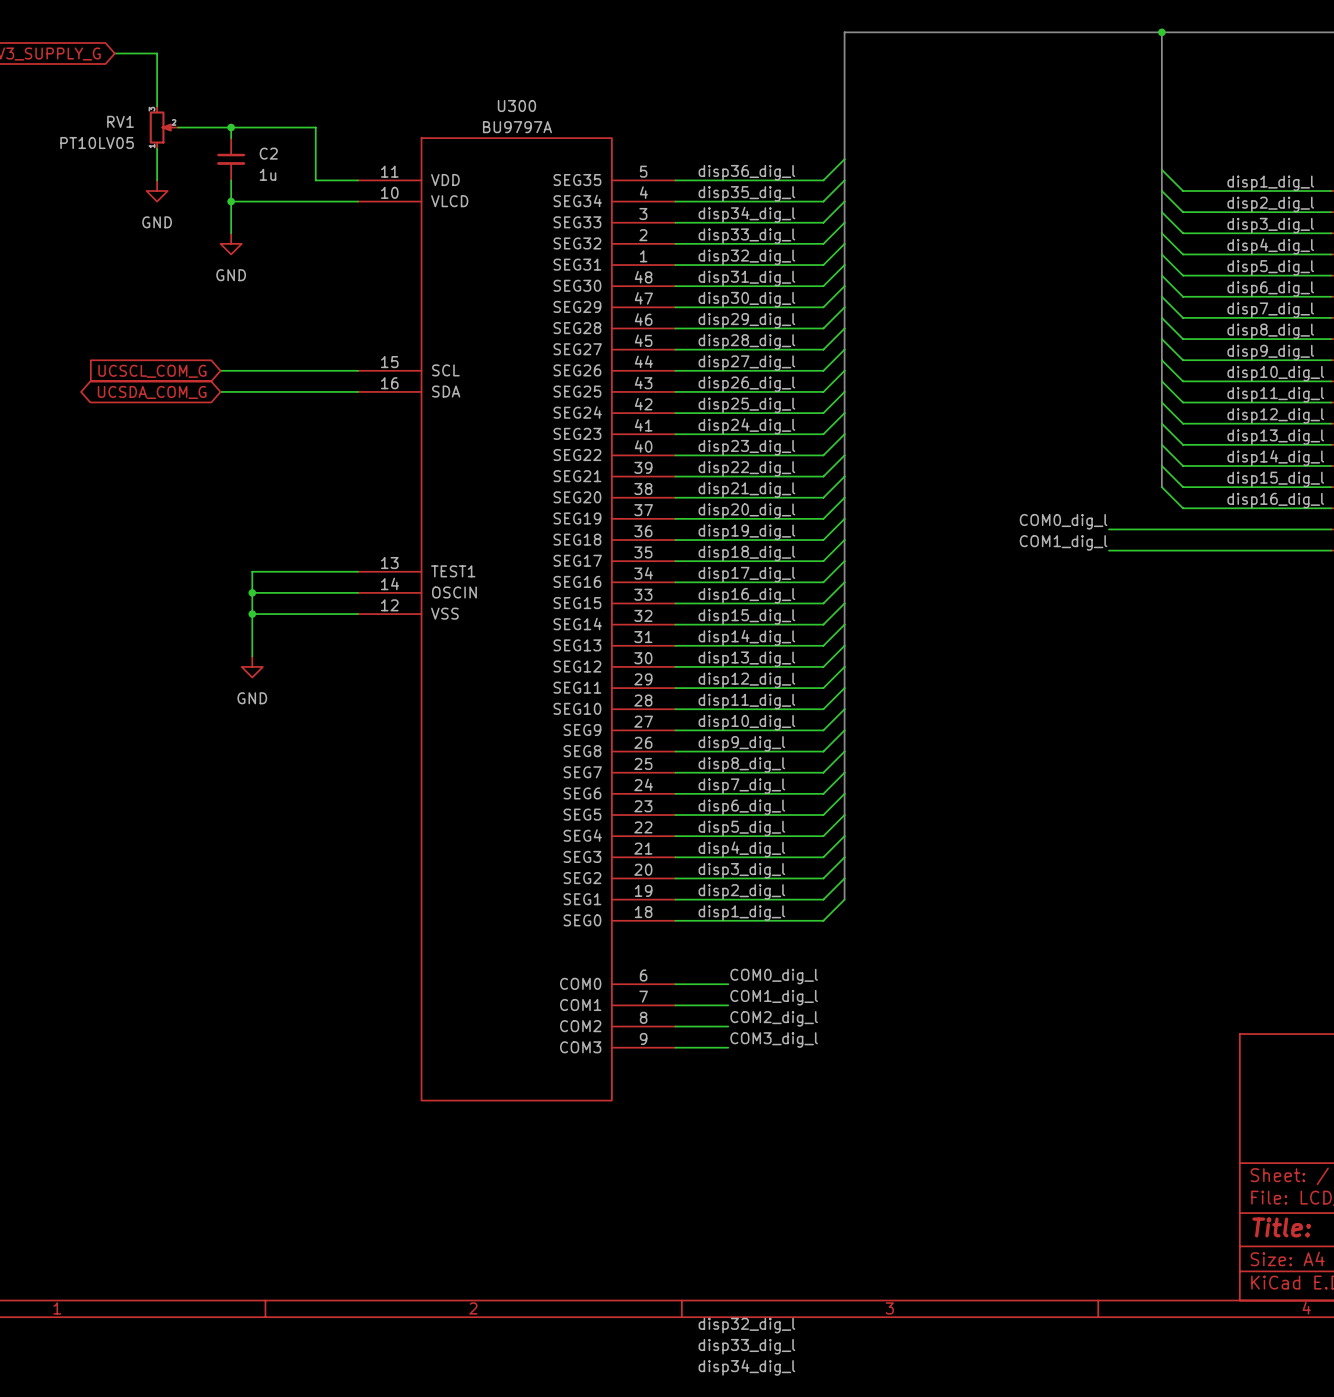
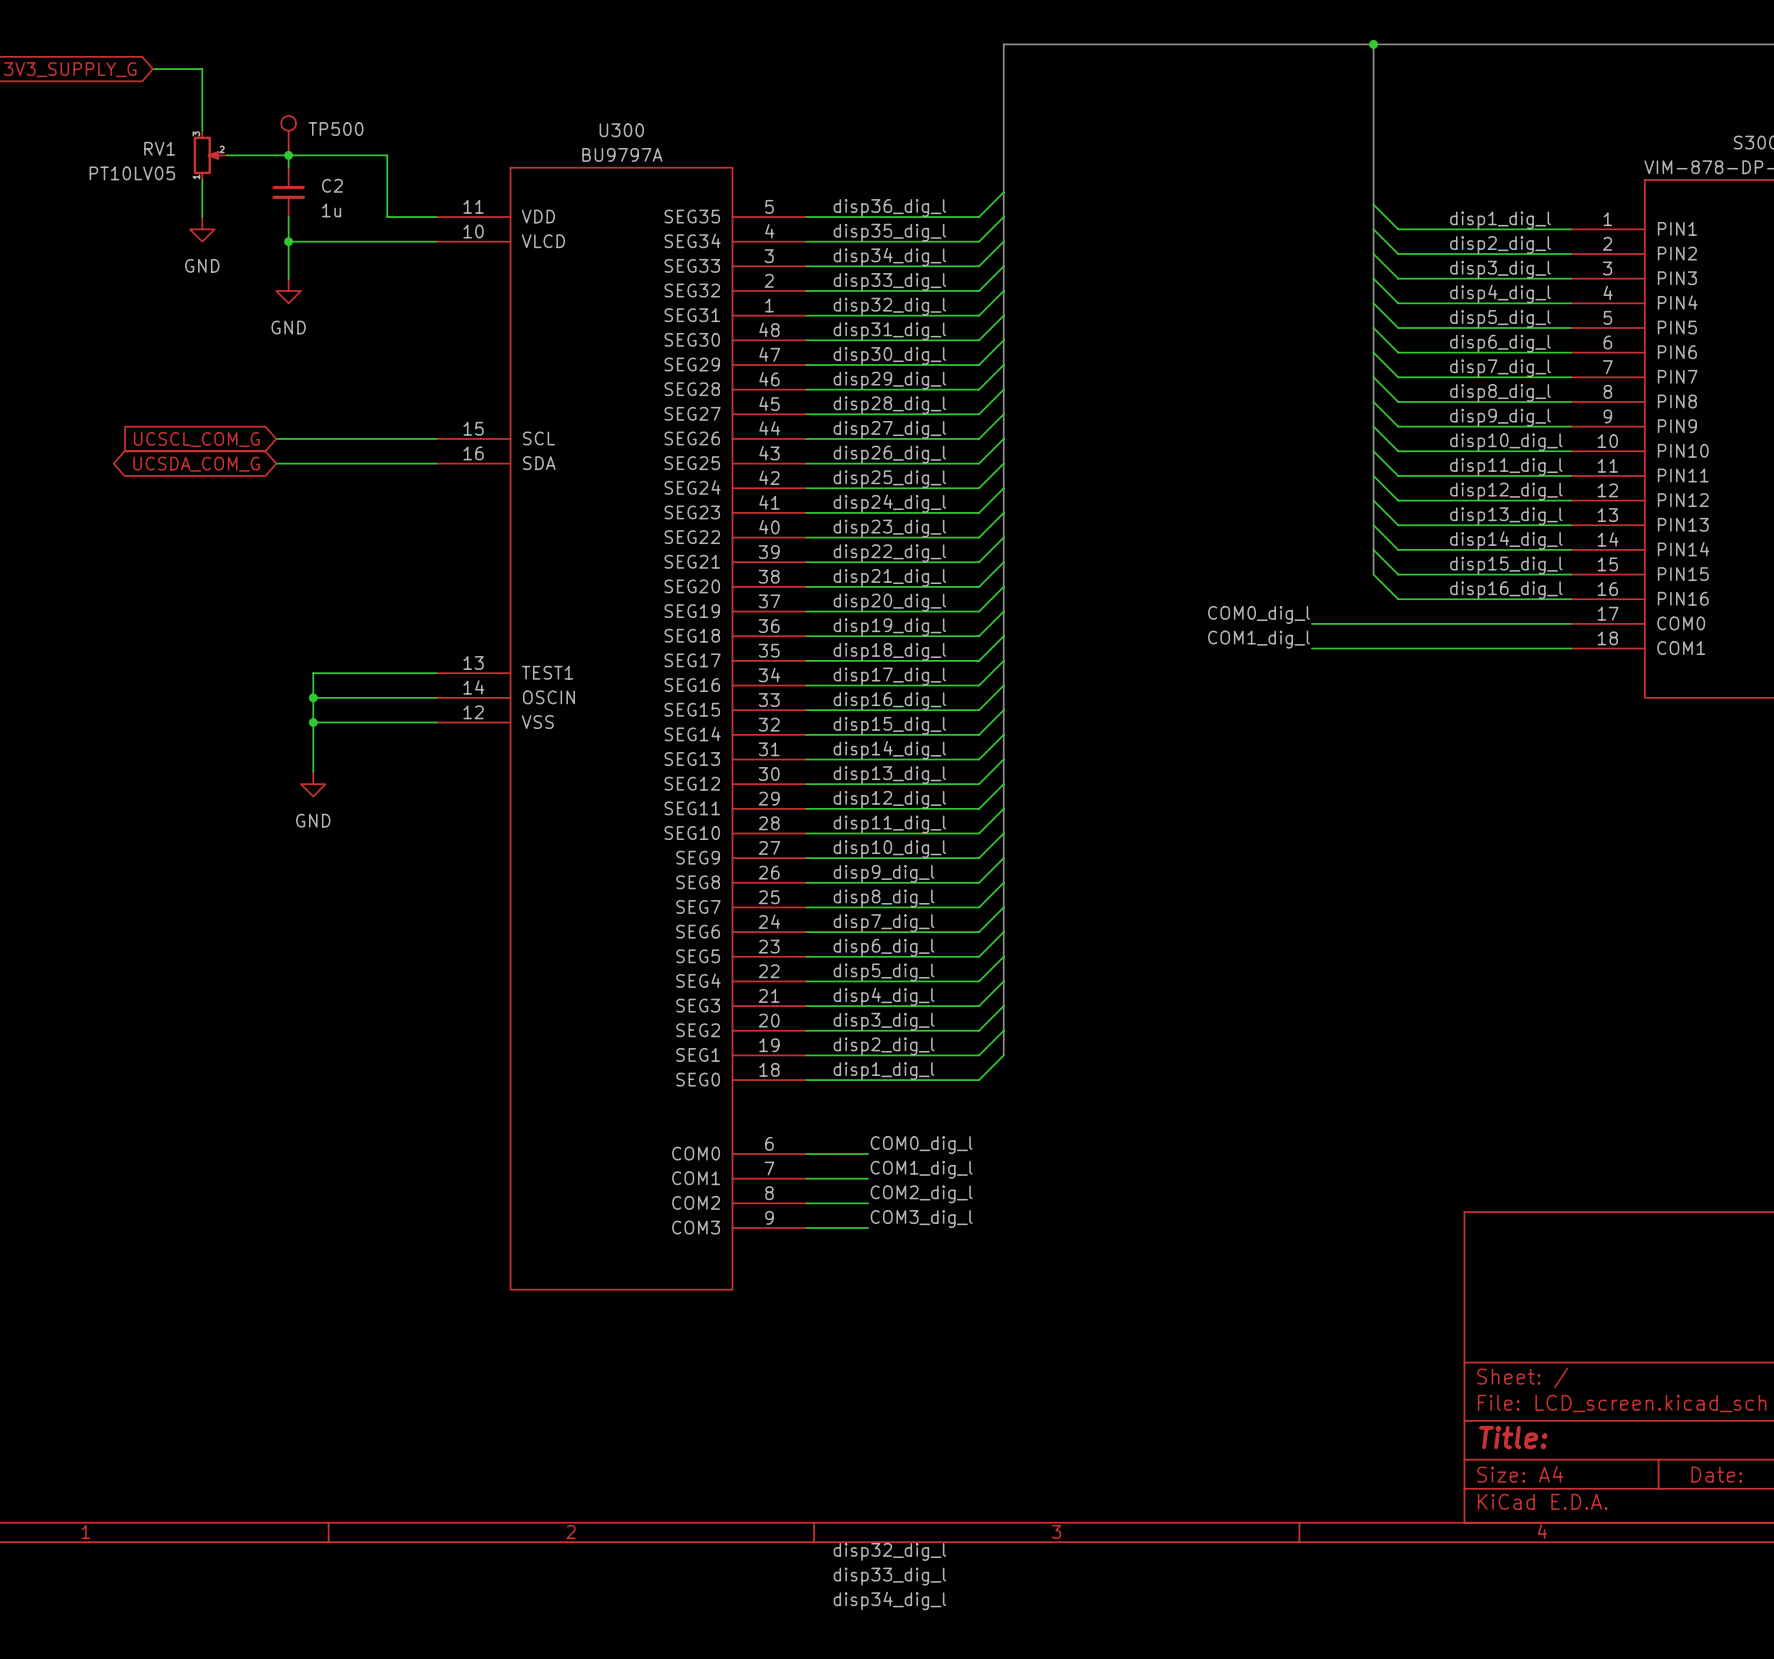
TP500: none -> (288, 135)

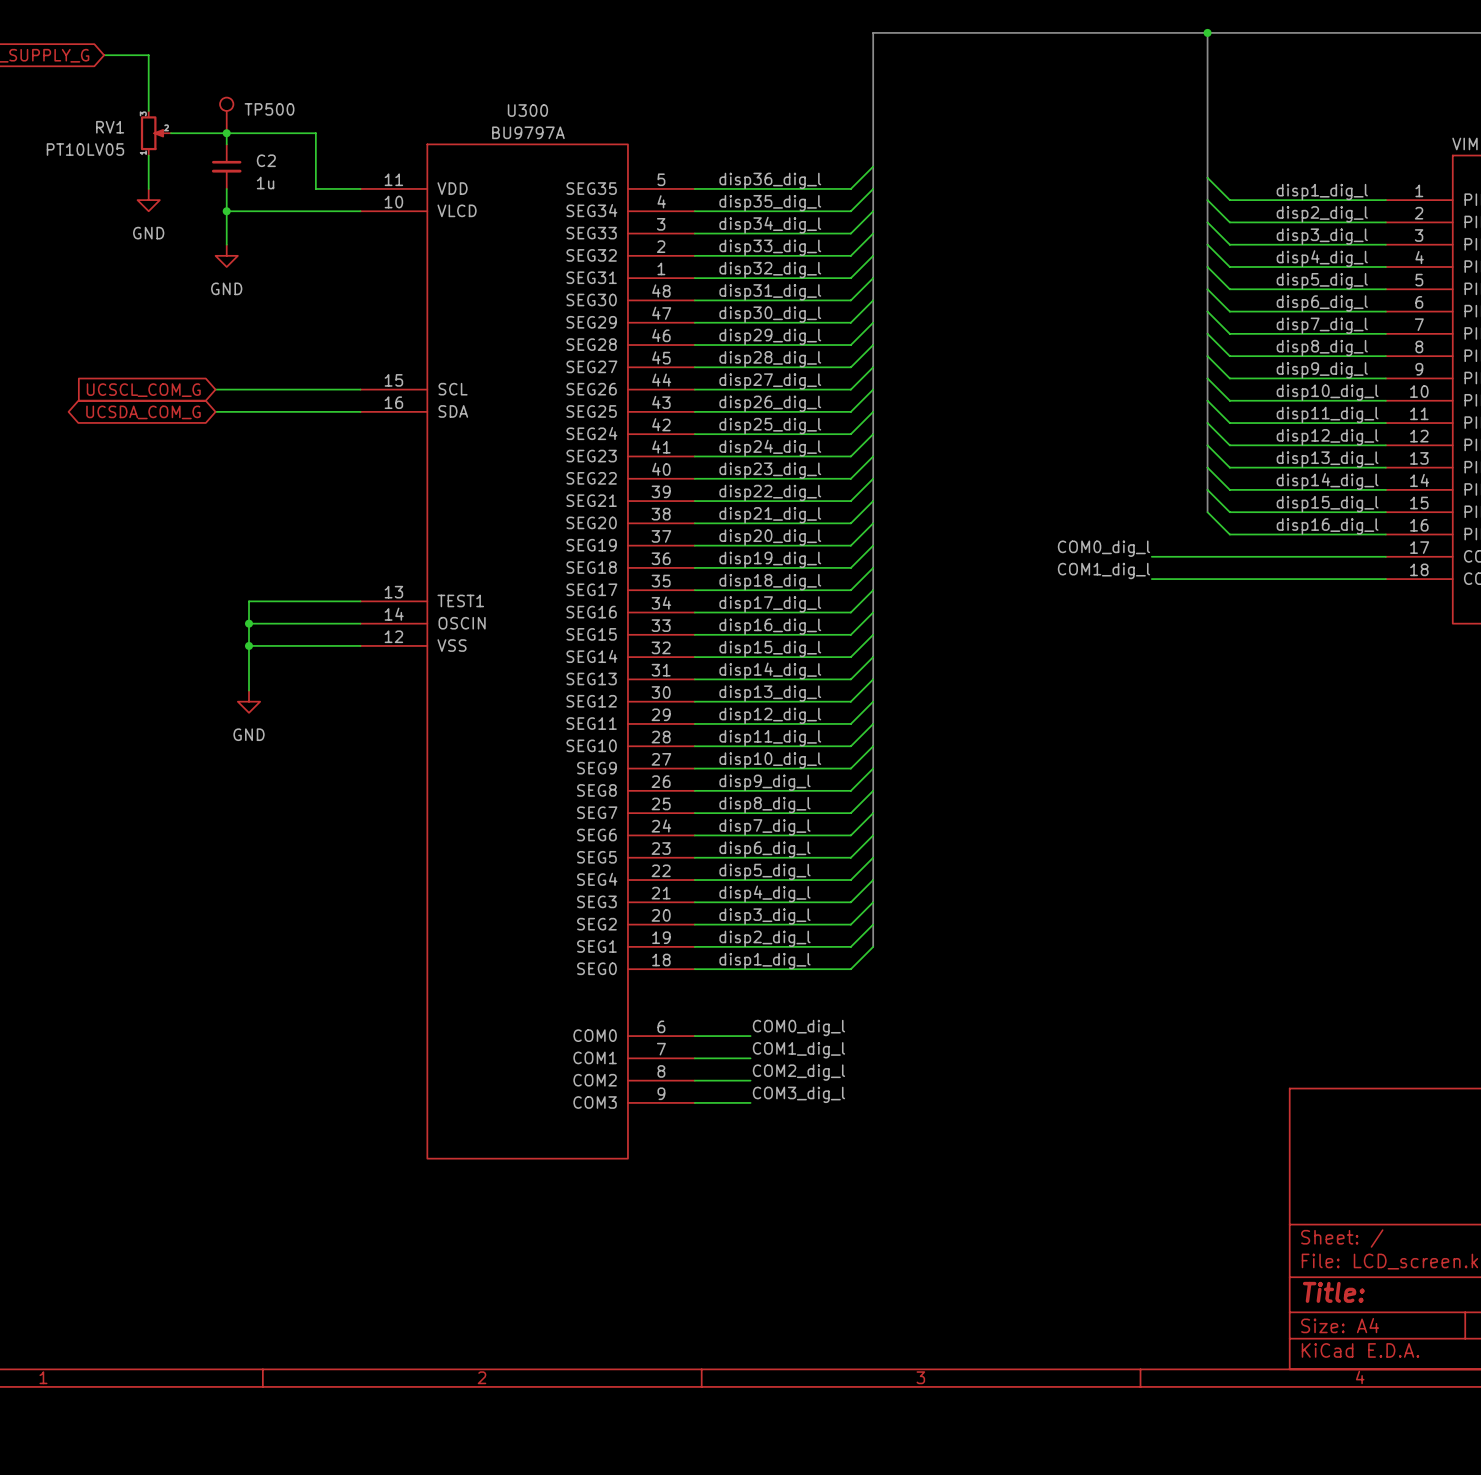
label: disp32_dig_l (889, 1551) -> none
label: disp33_dig_l (889, 1576) -> none
label: disp34_dig_l (889, 1600) -> none

